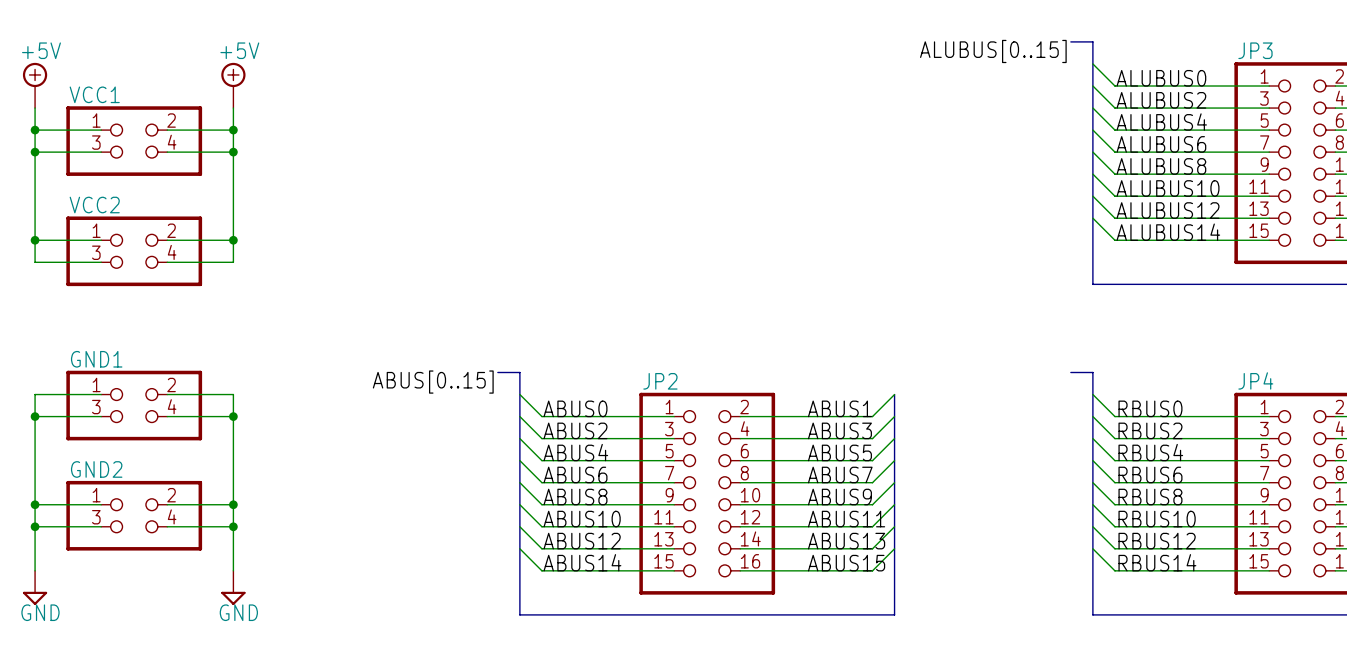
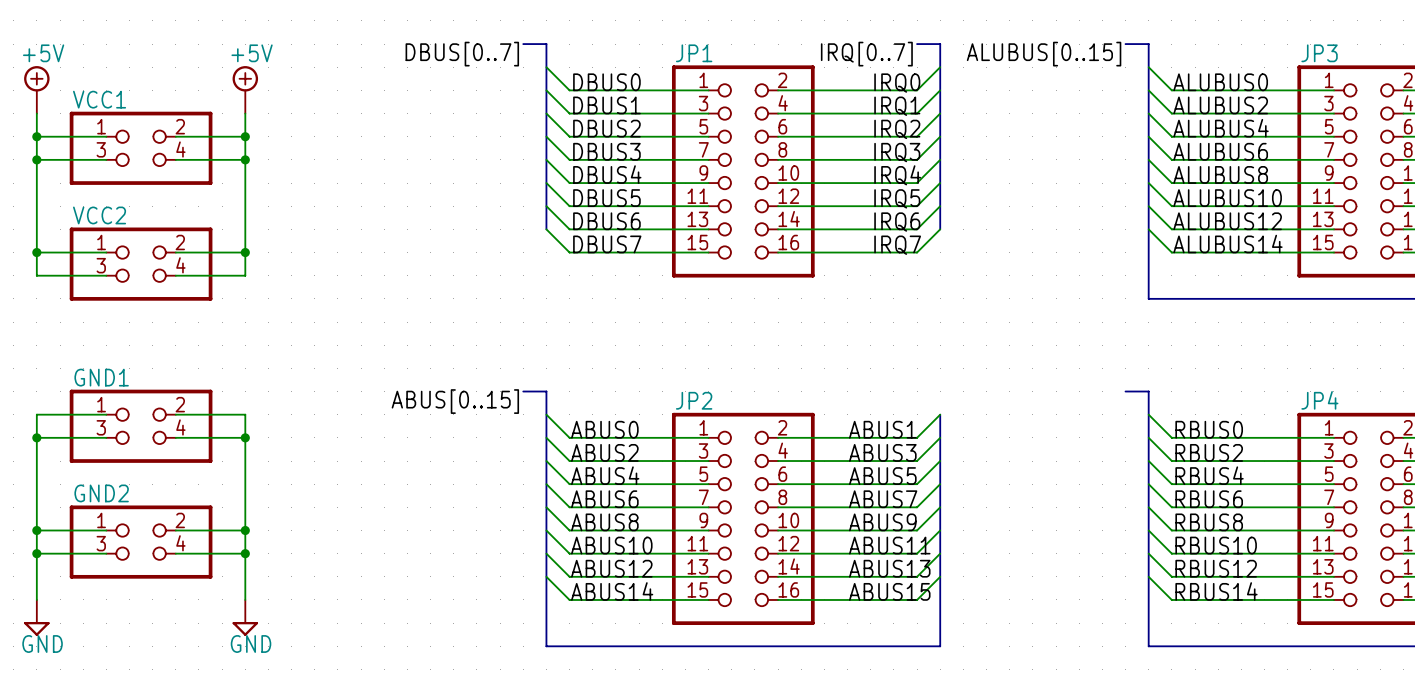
bus: none -> (523, 44) (546, 44) (546, 229)
bus: none -> (917, 44) (940, 44) (940, 229)
label: none -> DBUS[0..7] (462, 54)
label: none -> IRQ[0..7] (866, 54)
wire: none -> (546, 67) (569, 90) (708, 90)
wire: none -> (940, 67) (917, 90) (778, 90)
label: none -> DBUS0 (606, 82)
label: none -> IRQ0 (897, 83)
wire: none -> (546, 90) (569, 113) (708, 113)
wire: none -> (940, 90) (917, 113) (778, 113)
label: none -> DBUS1 (606, 105)
label: none -> IRQ1 (897, 106)
wire: none -> (546, 113) (569, 136) (708, 136)
wire: none -> (940, 113) (917, 136) (778, 136)
label: none -> DBUS2 (606, 128)
label: none -> IRQ2 (897, 129)
wire: none -> (546, 136) (569, 159) (708, 159)
wire: none -> (940, 136) (917, 159) (778, 159)
label: none -> DBUS3 (606, 151)
label: none -> IRQ3 (897, 152)
wire: none -> (546, 159) (569, 183) (708, 183)
wire: none -> (940, 159) (917, 183) (778, 183)
JP1: none -> (743, 171)
label: none -> DBUS4 (607, 174)
label: none -> IRQ4 (897, 175)
wire: none -> (546, 183) (569, 206) (708, 206)
wire: none -> (940, 183) (917, 206) (778, 206)
label: none -> DBUS5 (606, 198)
label: none -> IRQ5 (897, 198)
wire: none -> (546, 206) (569, 229) (708, 229)
wire: none -> (940, 206) (917, 229) (778, 229)
label: none -> DBUS6 (606, 221)
label: none -> IRQ6 (897, 222)
wire: none -> (546, 229) (569, 252) (708, 252)
wire: none -> (940, 229) (917, 252) (778, 252)
label: none -> DBUS7 (607, 244)
label: none -> IRQ7 (897, 245)

